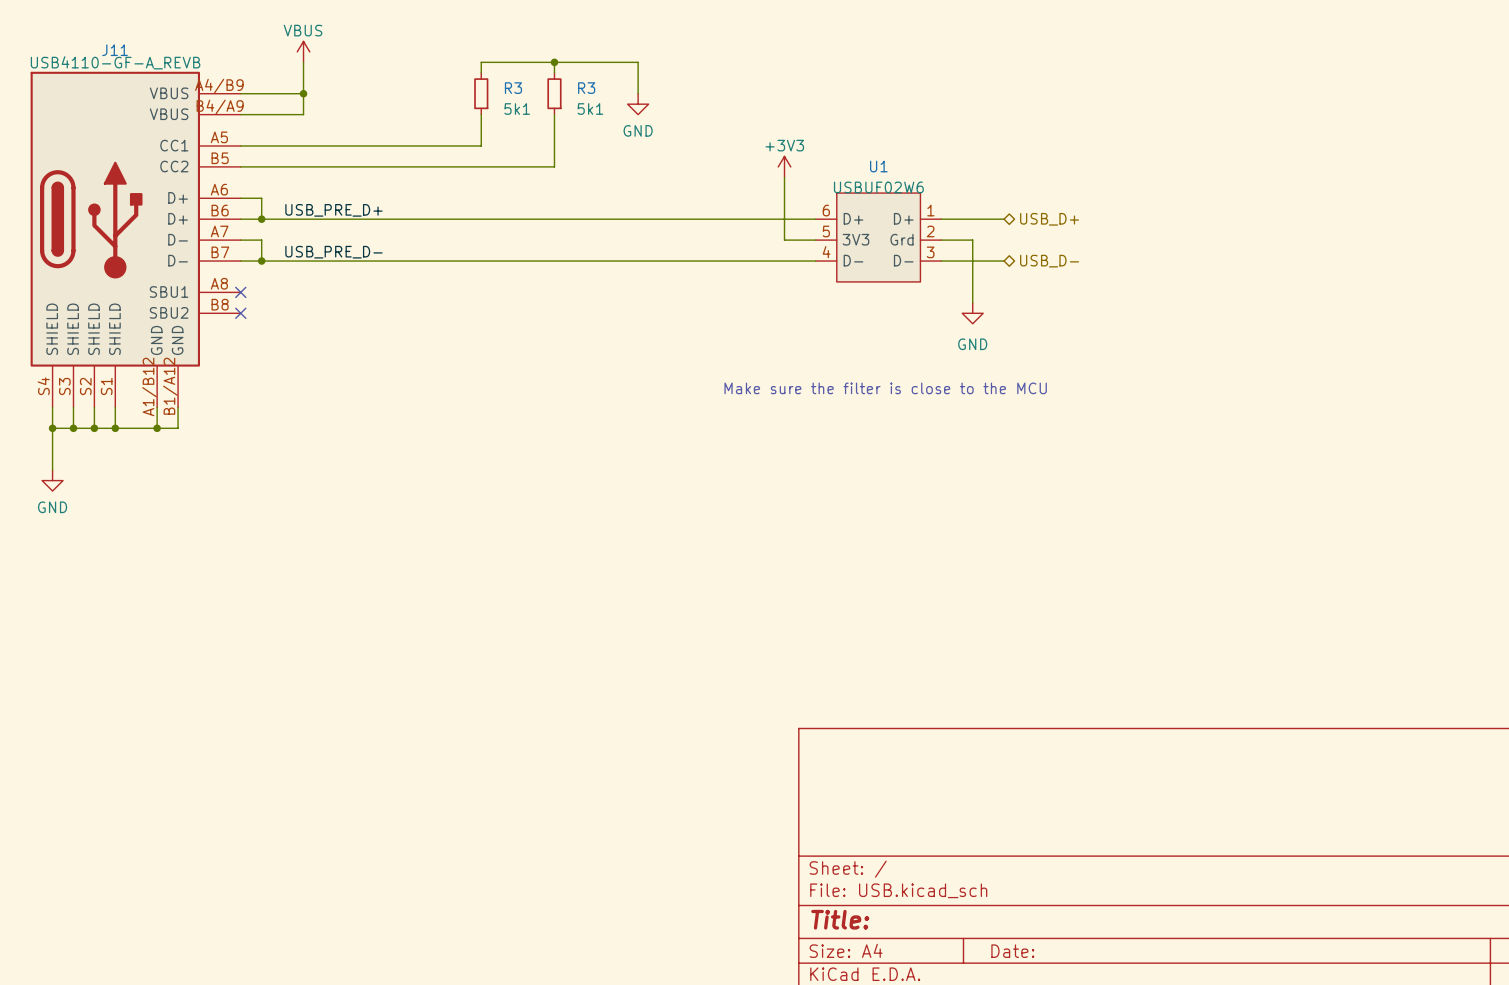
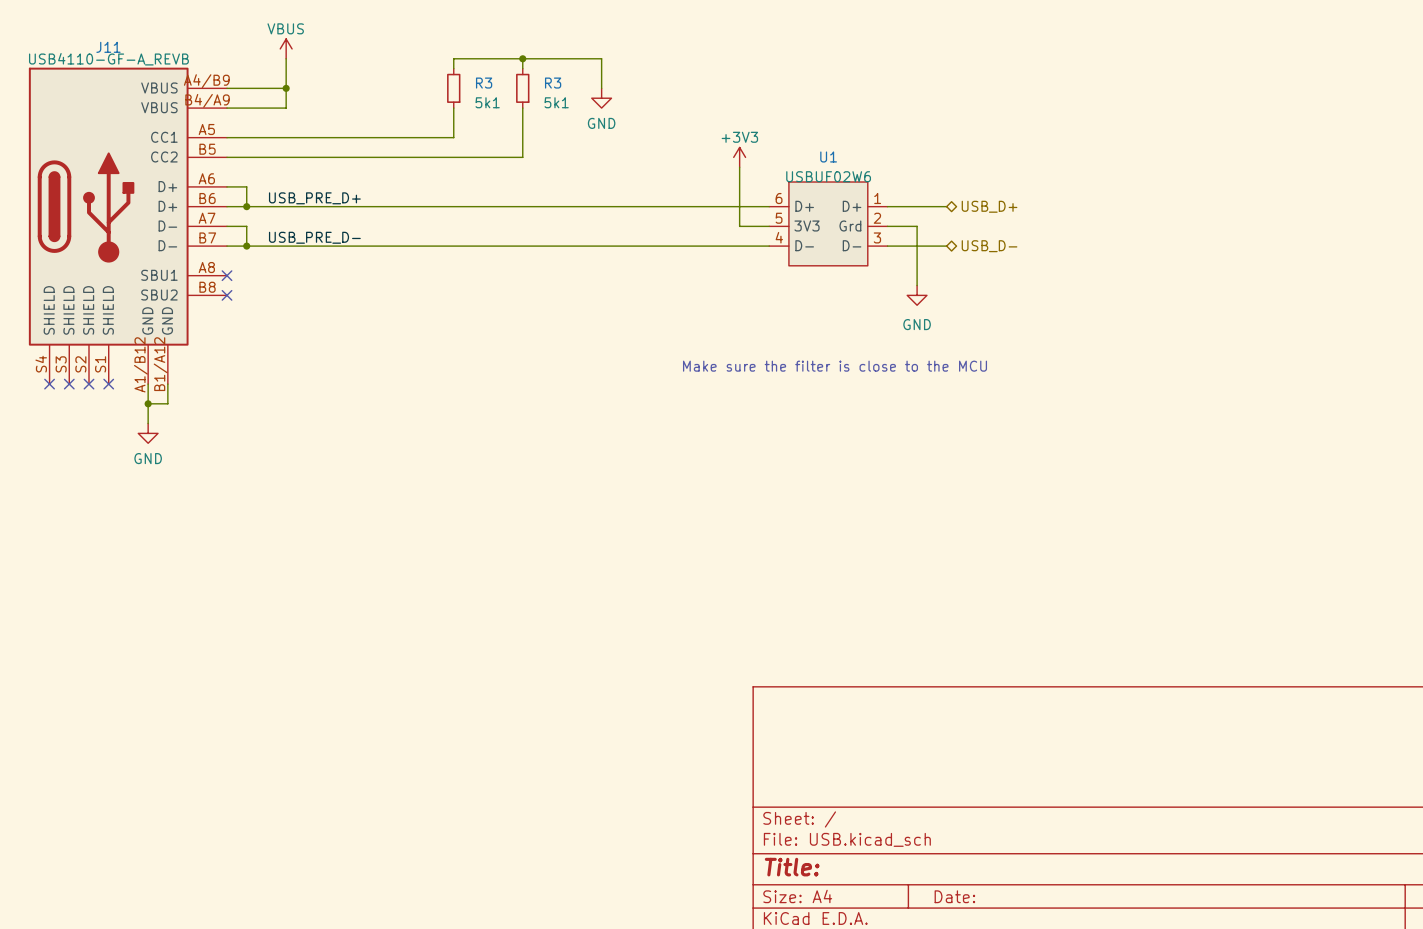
wire: (52, 407) (52, 470) -> none
no-connect mark: none -> (49, 384)
wire: (73, 407) (73, 428) -> none
no-connect mark: none -> (69, 384)
wire: (94, 407) (94, 428) -> none
no-connect mark: none -> (88, 384)
wire: (115, 407) (115, 428) -> none
no-connect mark: none -> (108, 384)
wire: (52, 428) (157, 428) -> (148, 423) (148, 403)
junction: (52, 428) -> none
junction: (73, 428) -> none
junction: (94, 428) -> none
junction: (115, 428) -> none
power symbol position: GND (52, 480) -> GND (148, 433)

